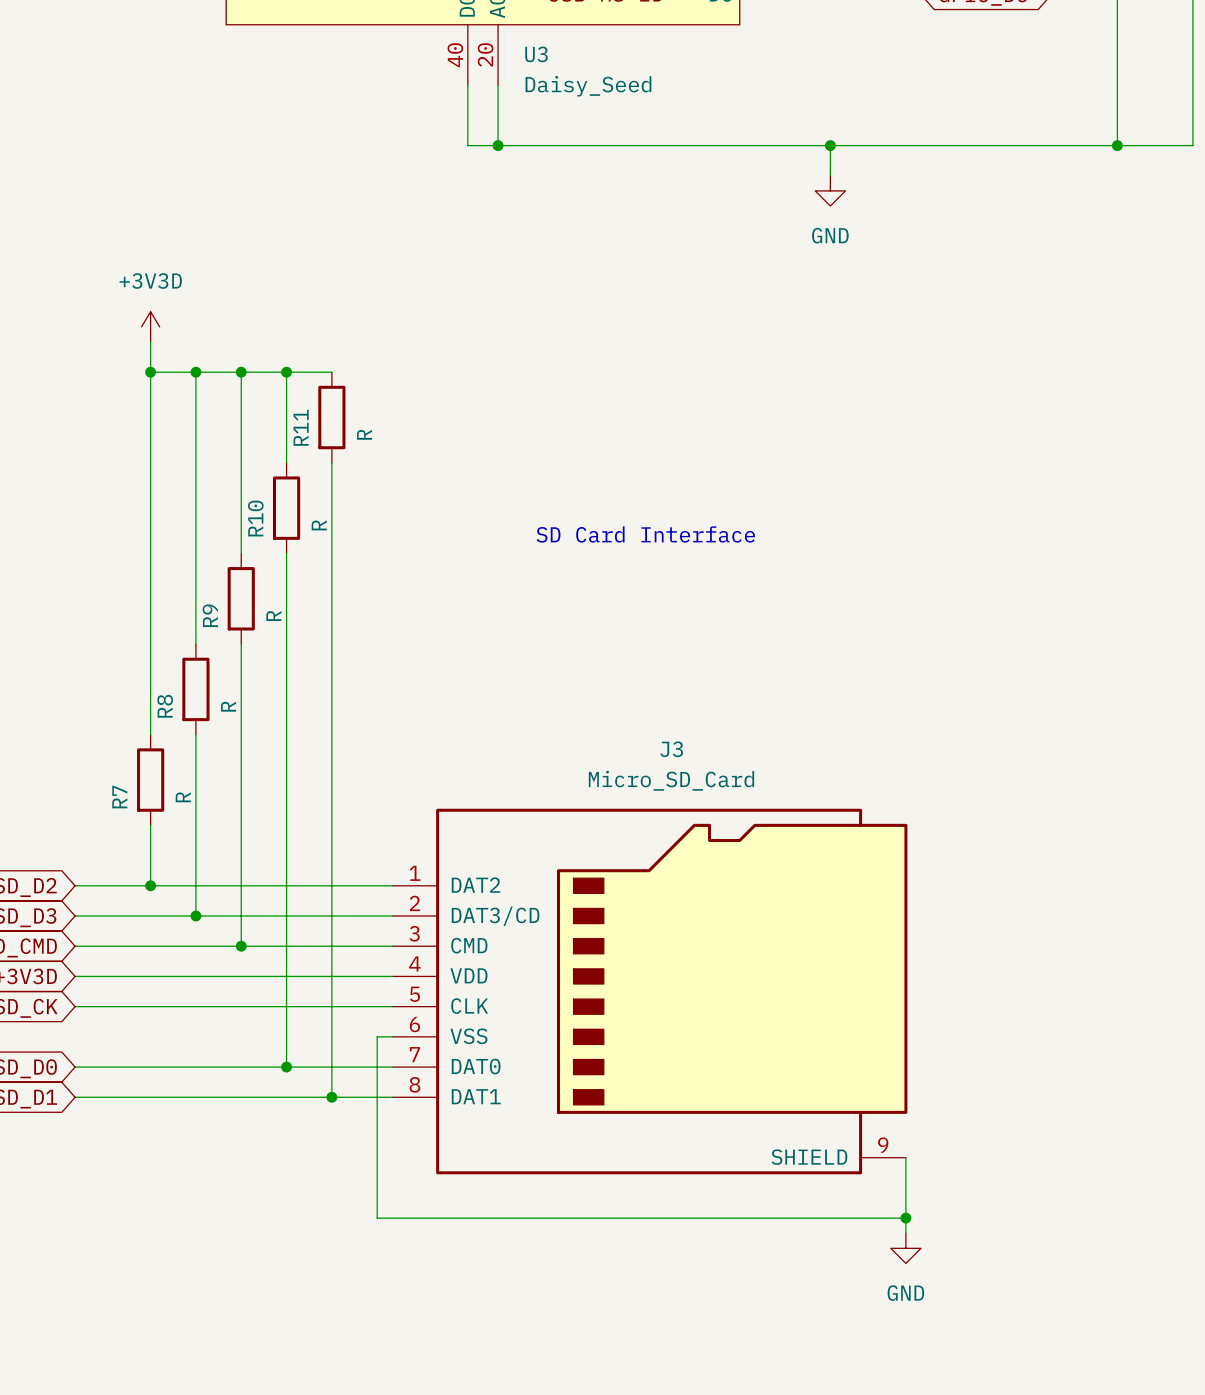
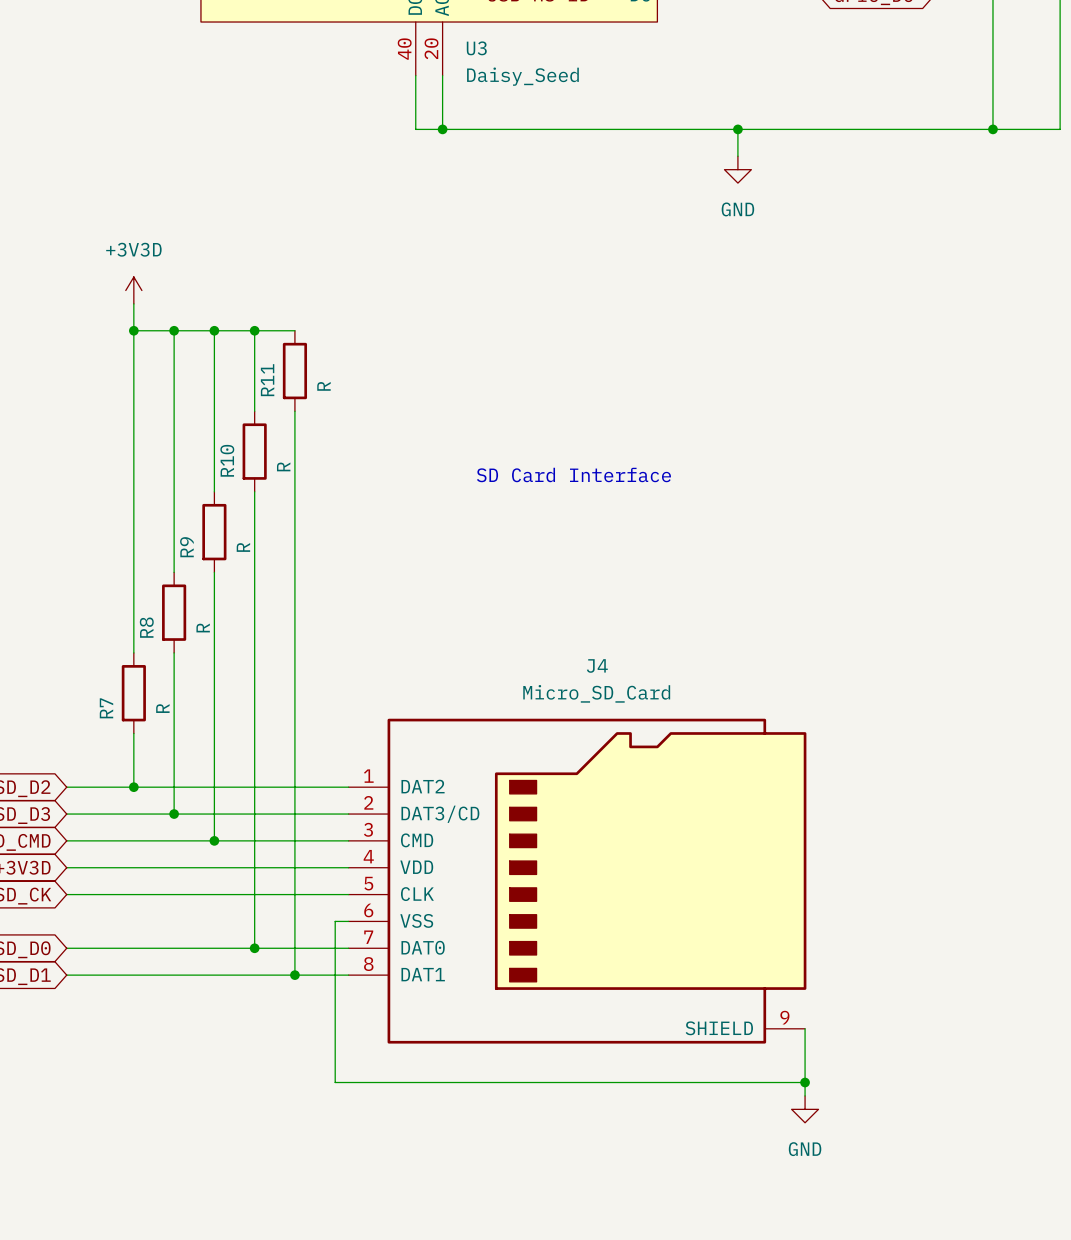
J3 name: J3 (671, 749) -> J4 (597, 665)

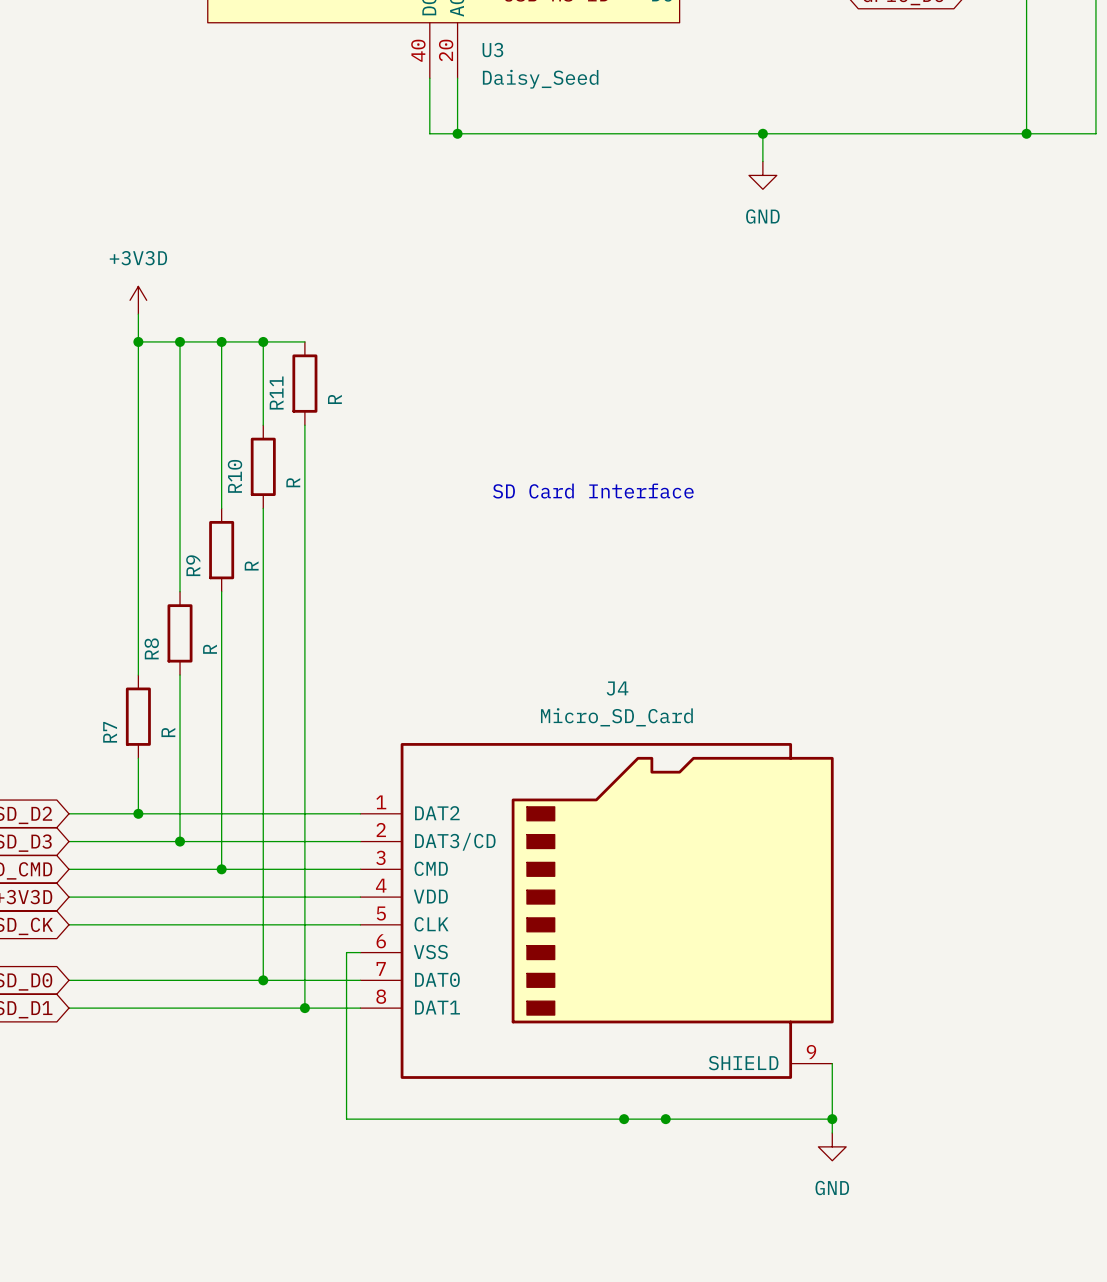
junction: none -> (624, 1119)
junction: none -> (665, 1119)

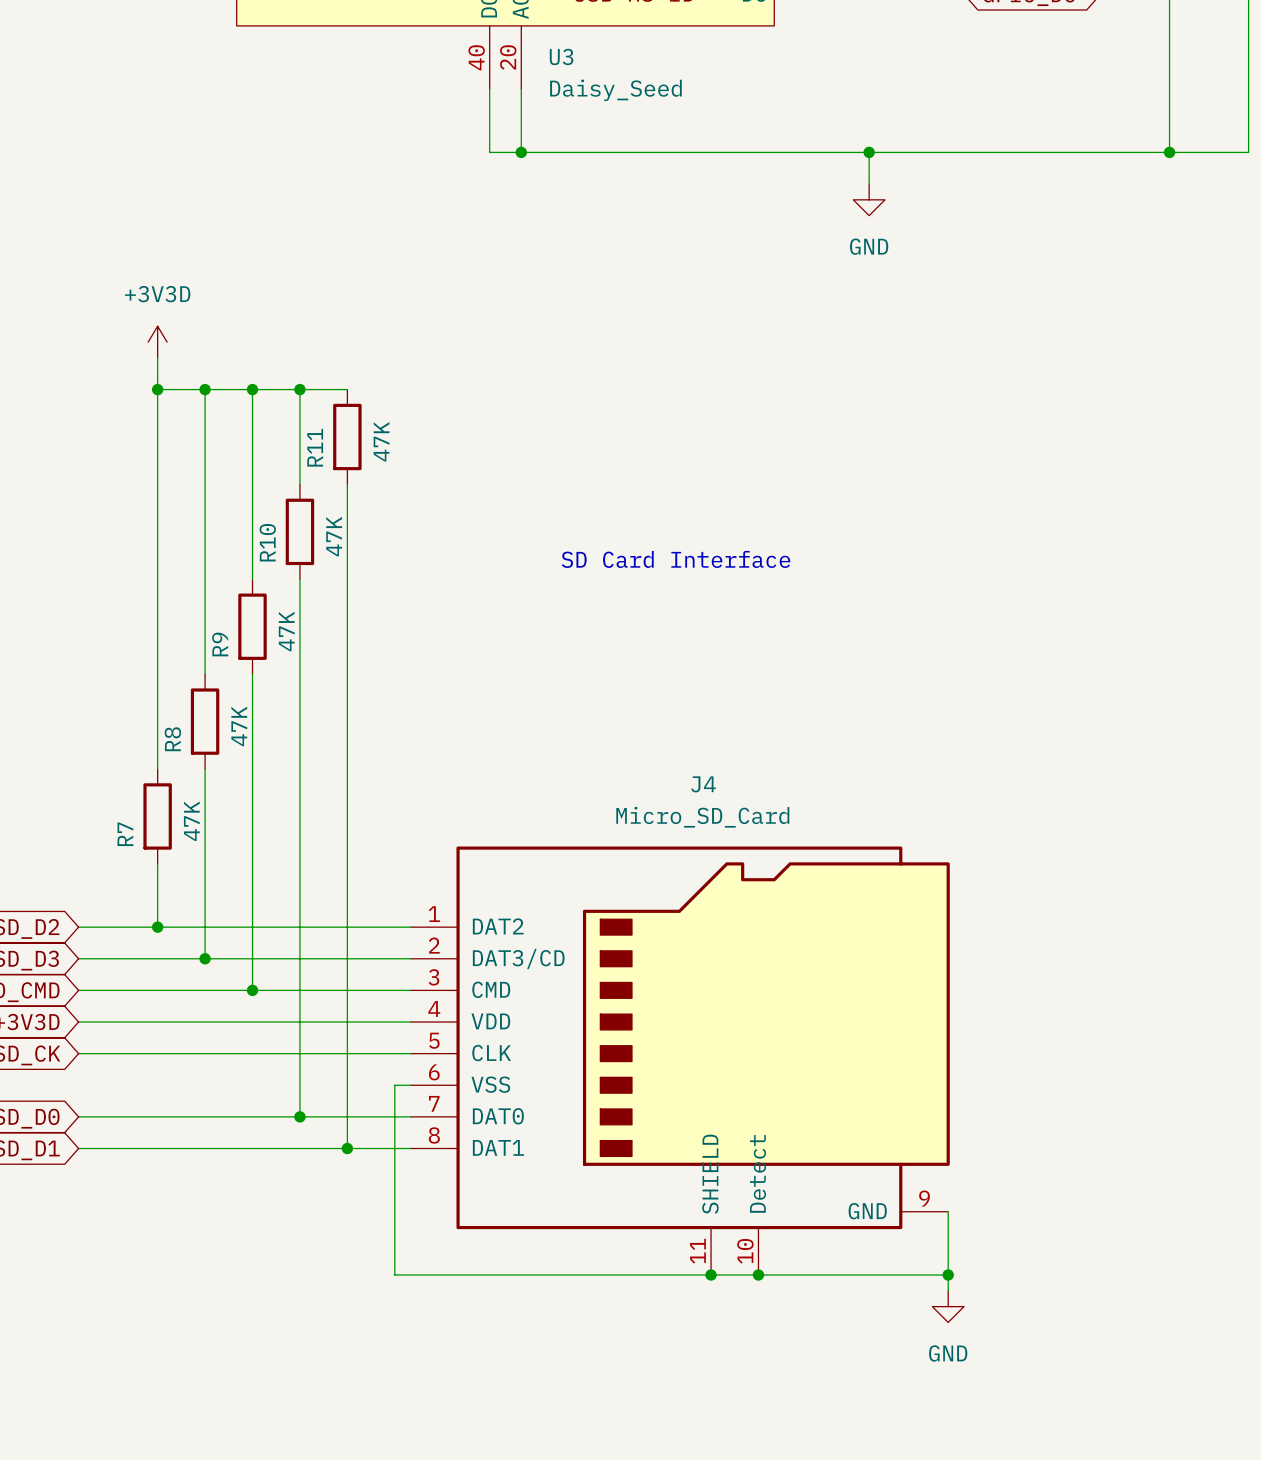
R11 value: R (334, 399) -> 47K (381, 441)
R10 value: R (293, 482) -> 47K (334, 536)
R9 value: R (251, 565) -> 47K (286, 631)
R8 value: R (210, 649) -> 47K (239, 726)
R7 value: R (168, 732) -> 47K (191, 821)
J4 symbol: [360, 743, 834, 1079] -> [410, 846, 950, 1275]

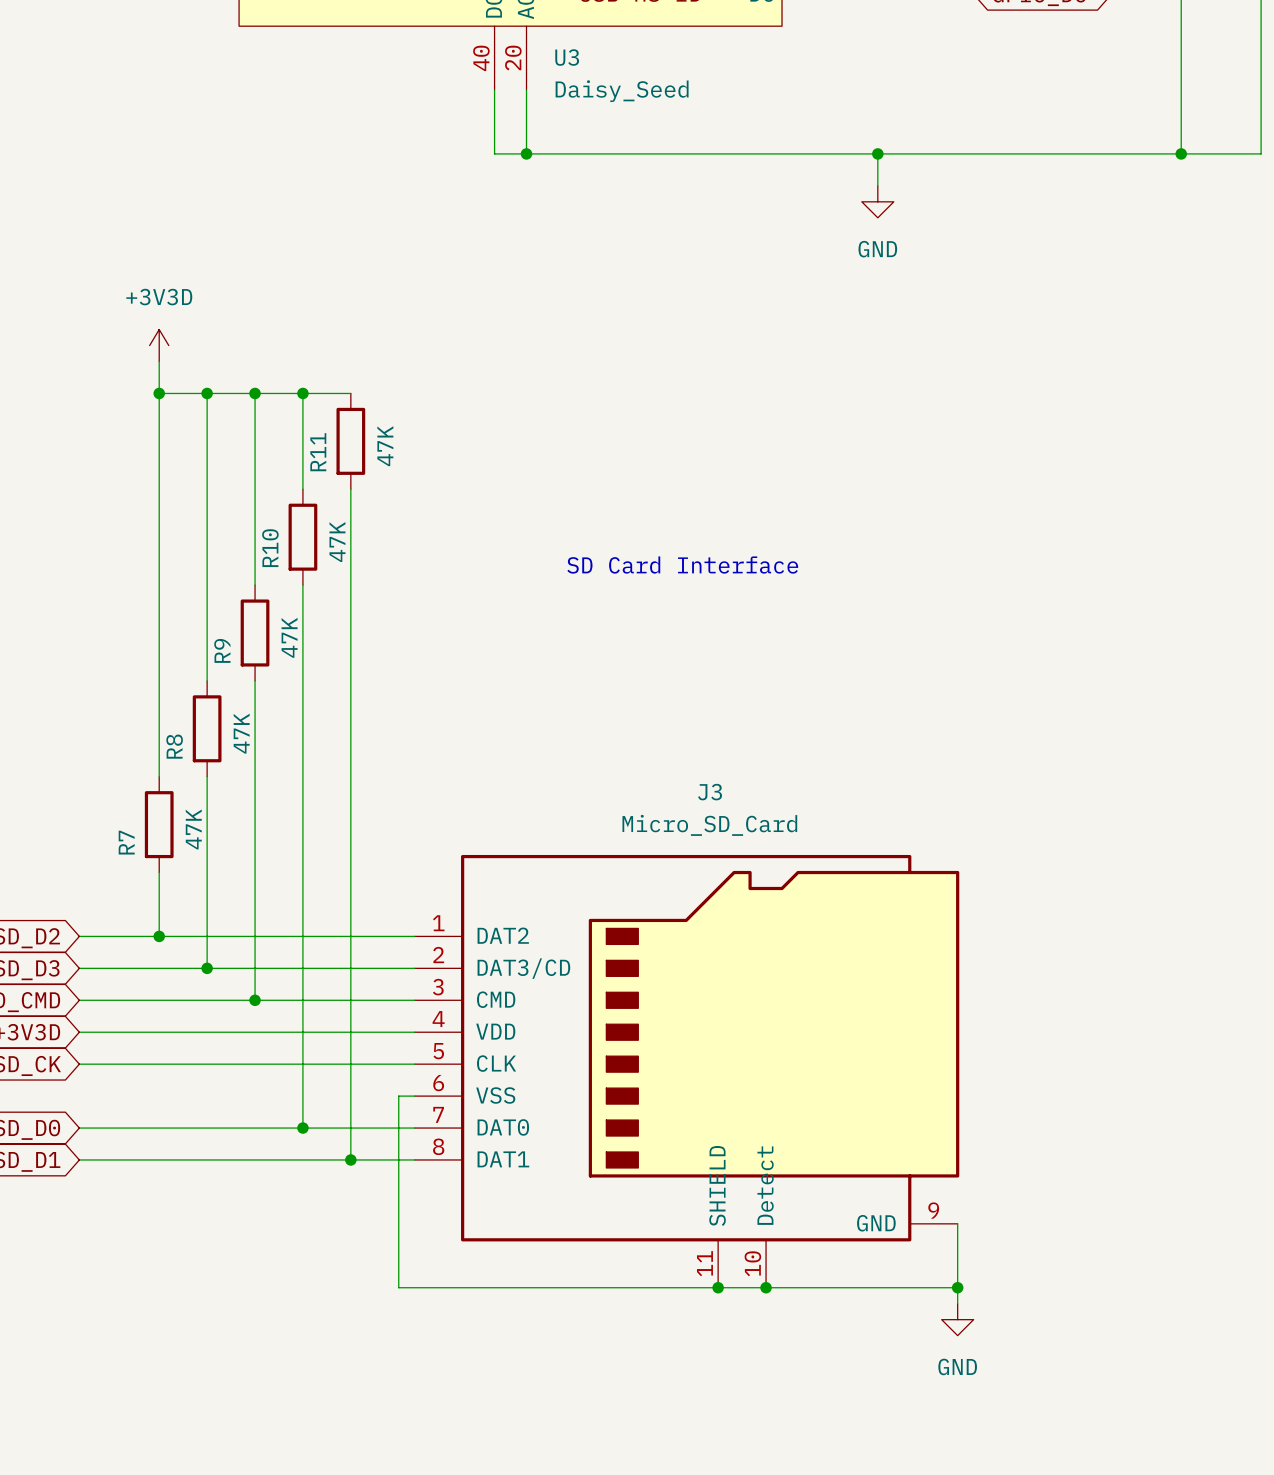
J4 name: J4 (703, 784) -> J3 (710, 792)

